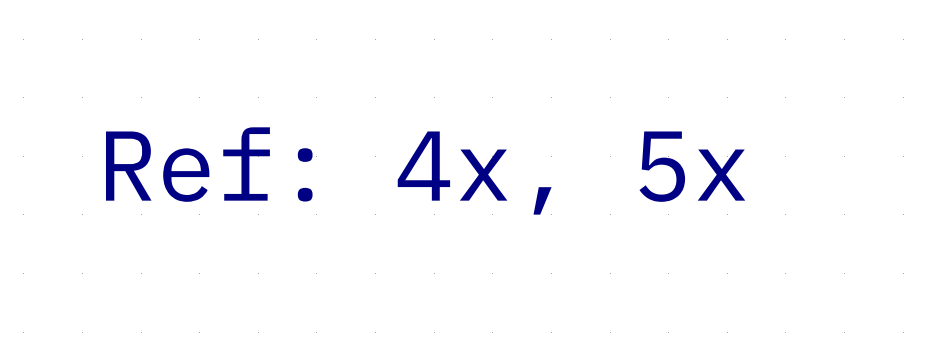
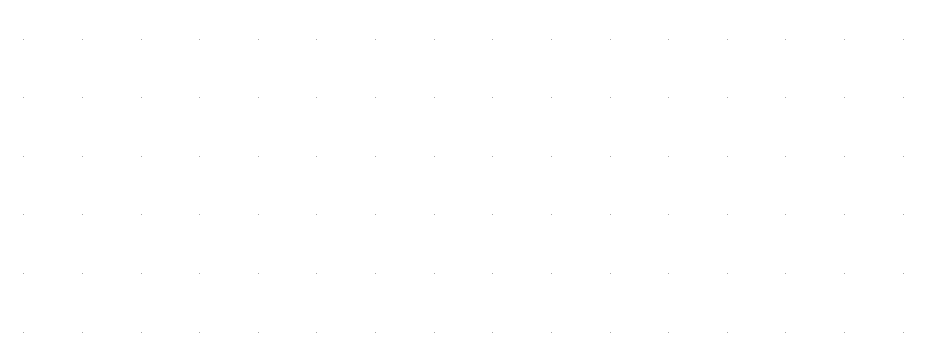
text: Ref: 4x, 5x (425, 170) -> none

